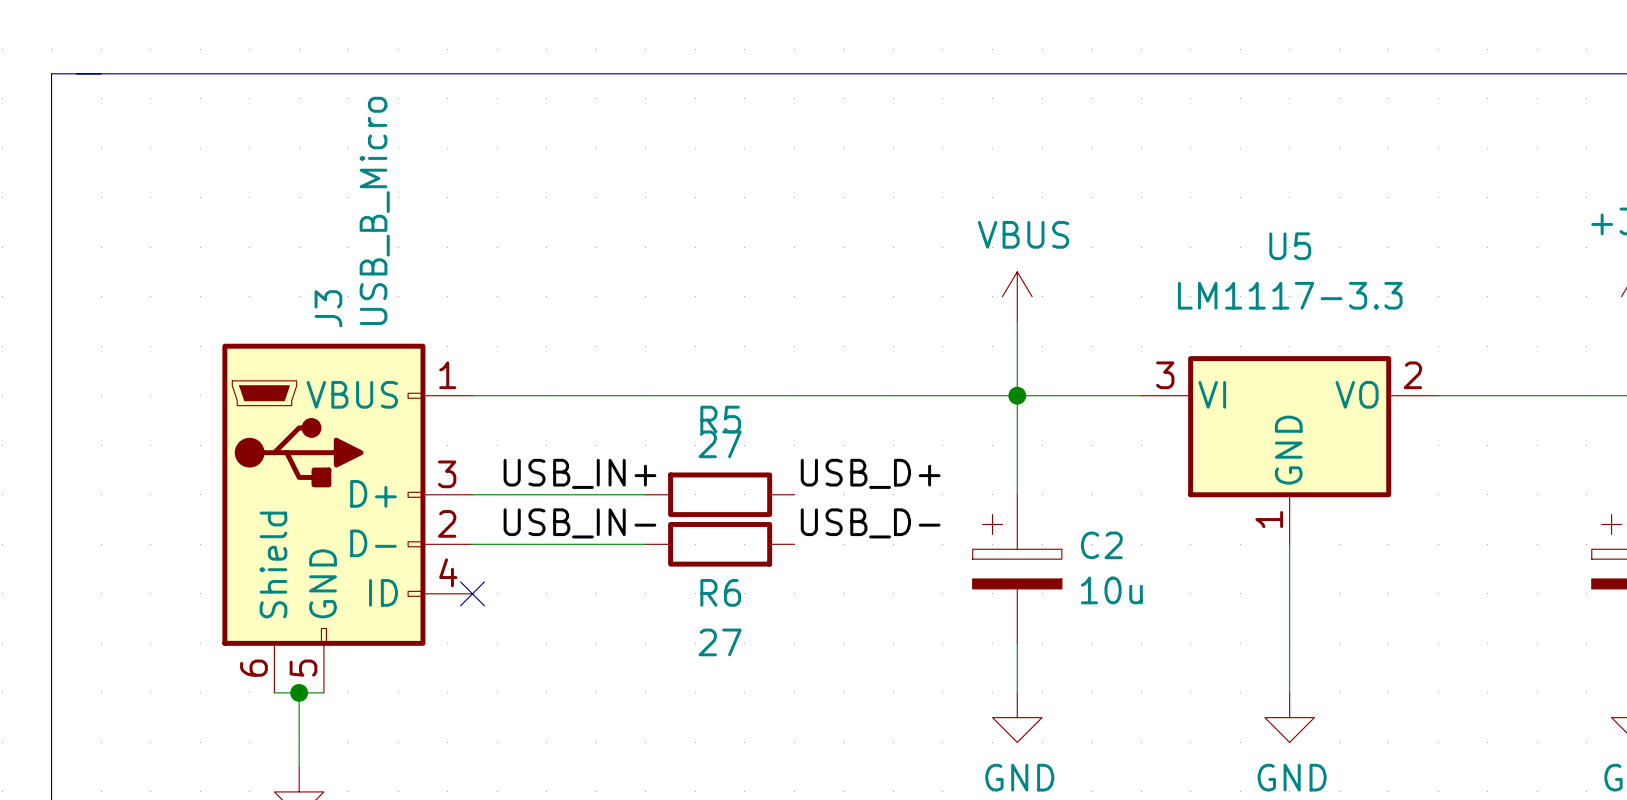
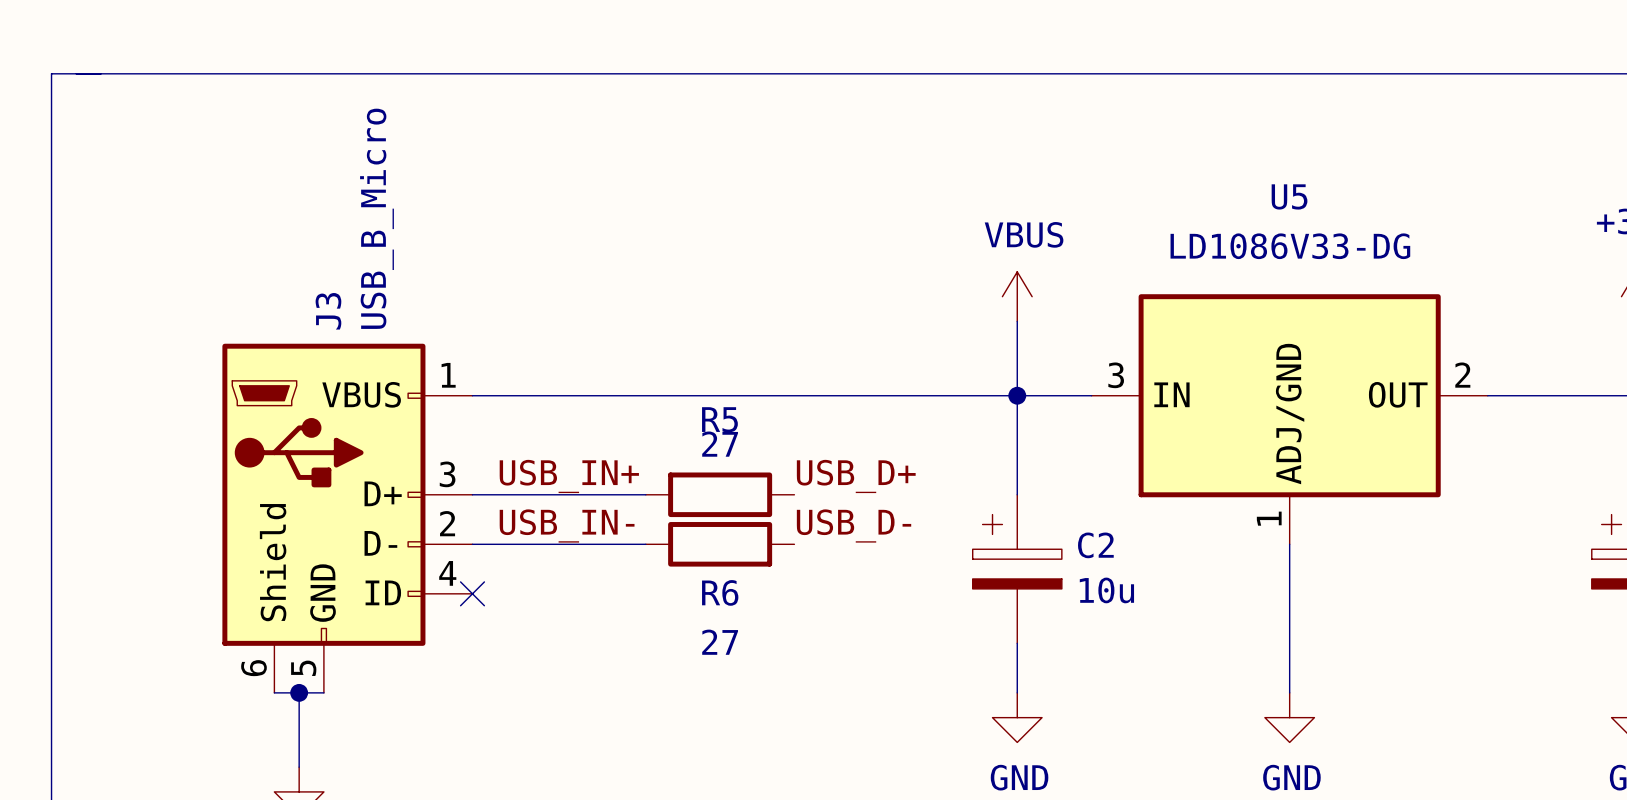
U5 value: LM1117-3.3 (1290, 295) -> LD1086V33-DG (1290, 246)
U5 symbol: [1141, 356, 1439, 545] -> [1091, 294, 1488, 545]

